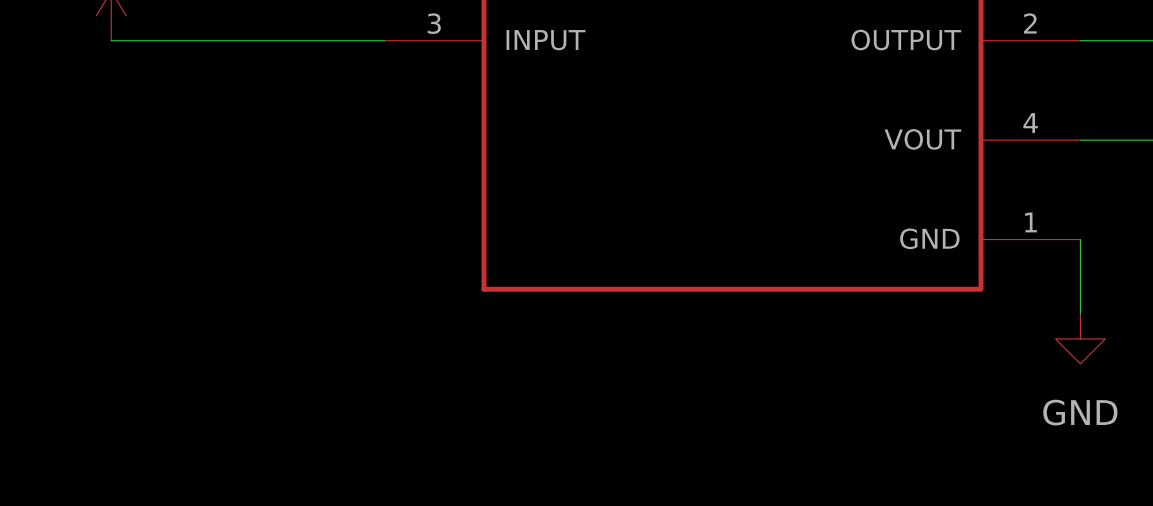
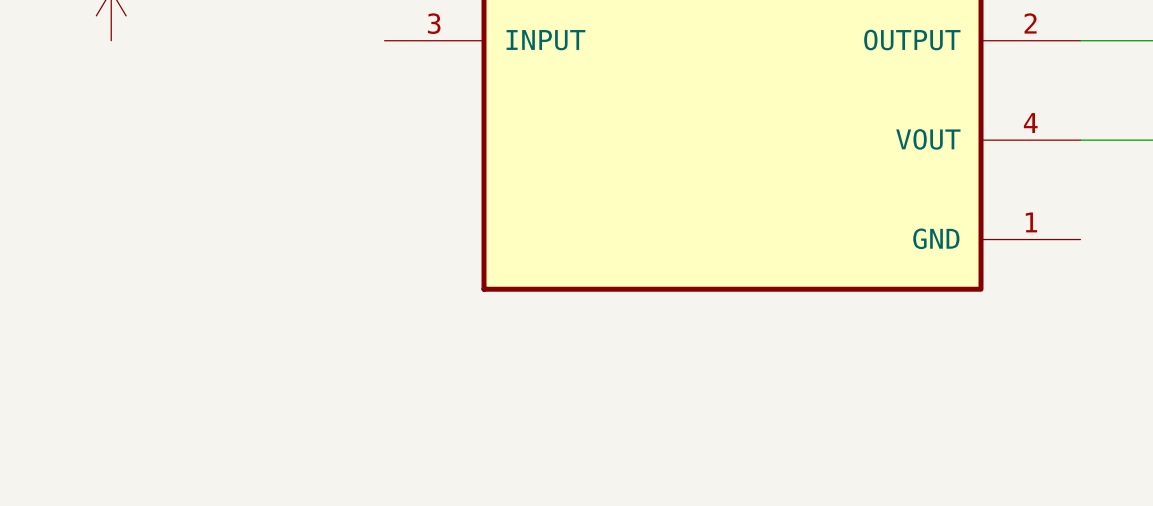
wire: (111, 40) (384, 40) -> none
wire: (1080, 239) (1080, 314) -> none
power symbol: GND (1080, 338) -> none

